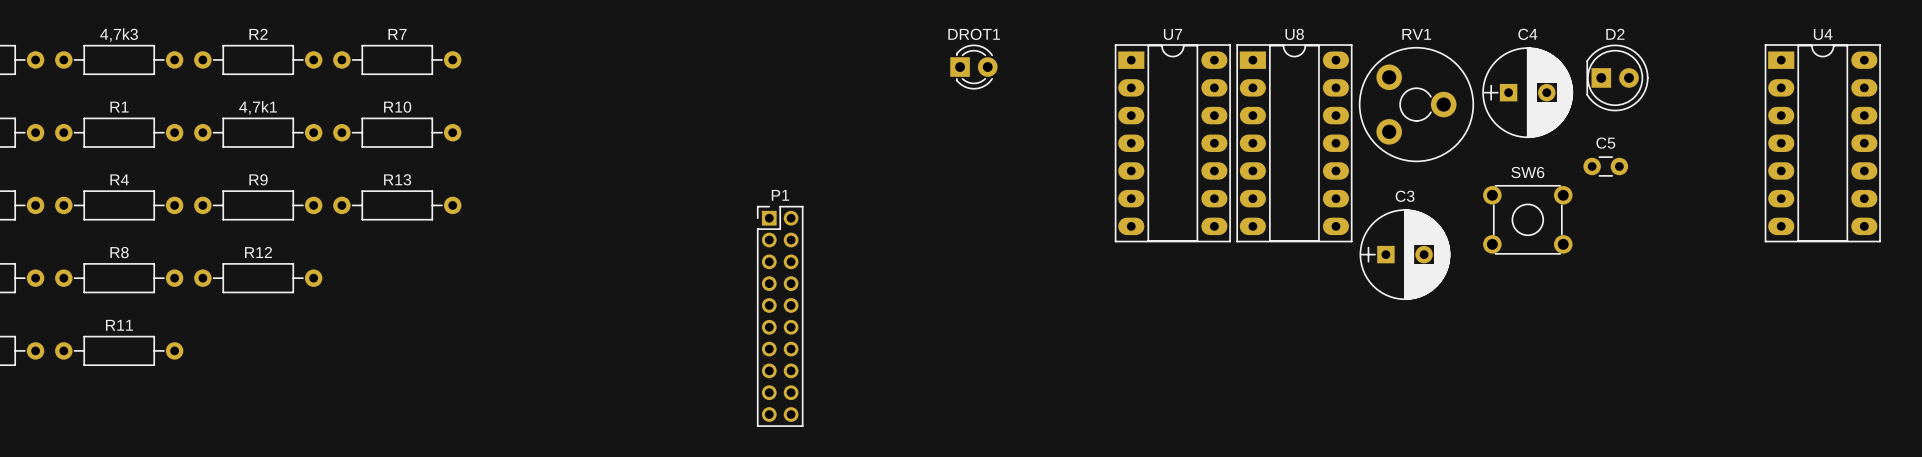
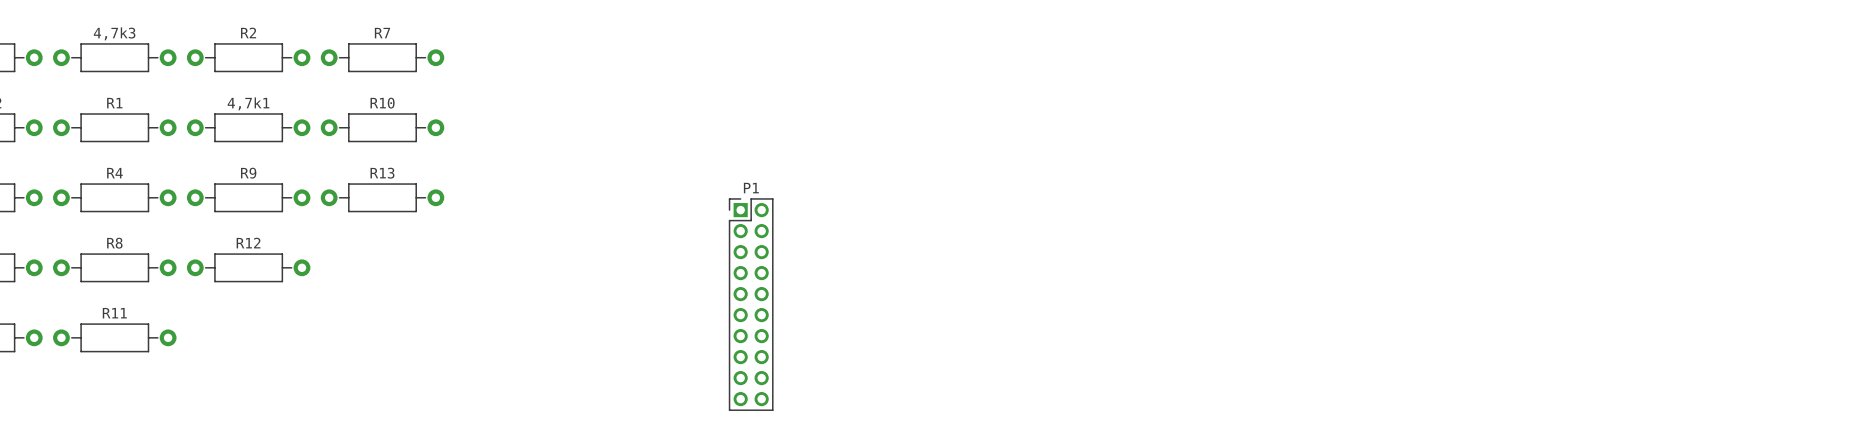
DROT1: (973, 67) -> none
D2: (1617, 77) -> none
C4: (1527, 92) -> none
RV1: (1416, 104) -> none
U7: (1172, 143) -> none
U8: (1294, 143) -> none
U4: (1822, 143) -> none
C5: (1605, 166) -> none
SW6: (1527, 219) -> none
C3: (1405, 254) -> none

